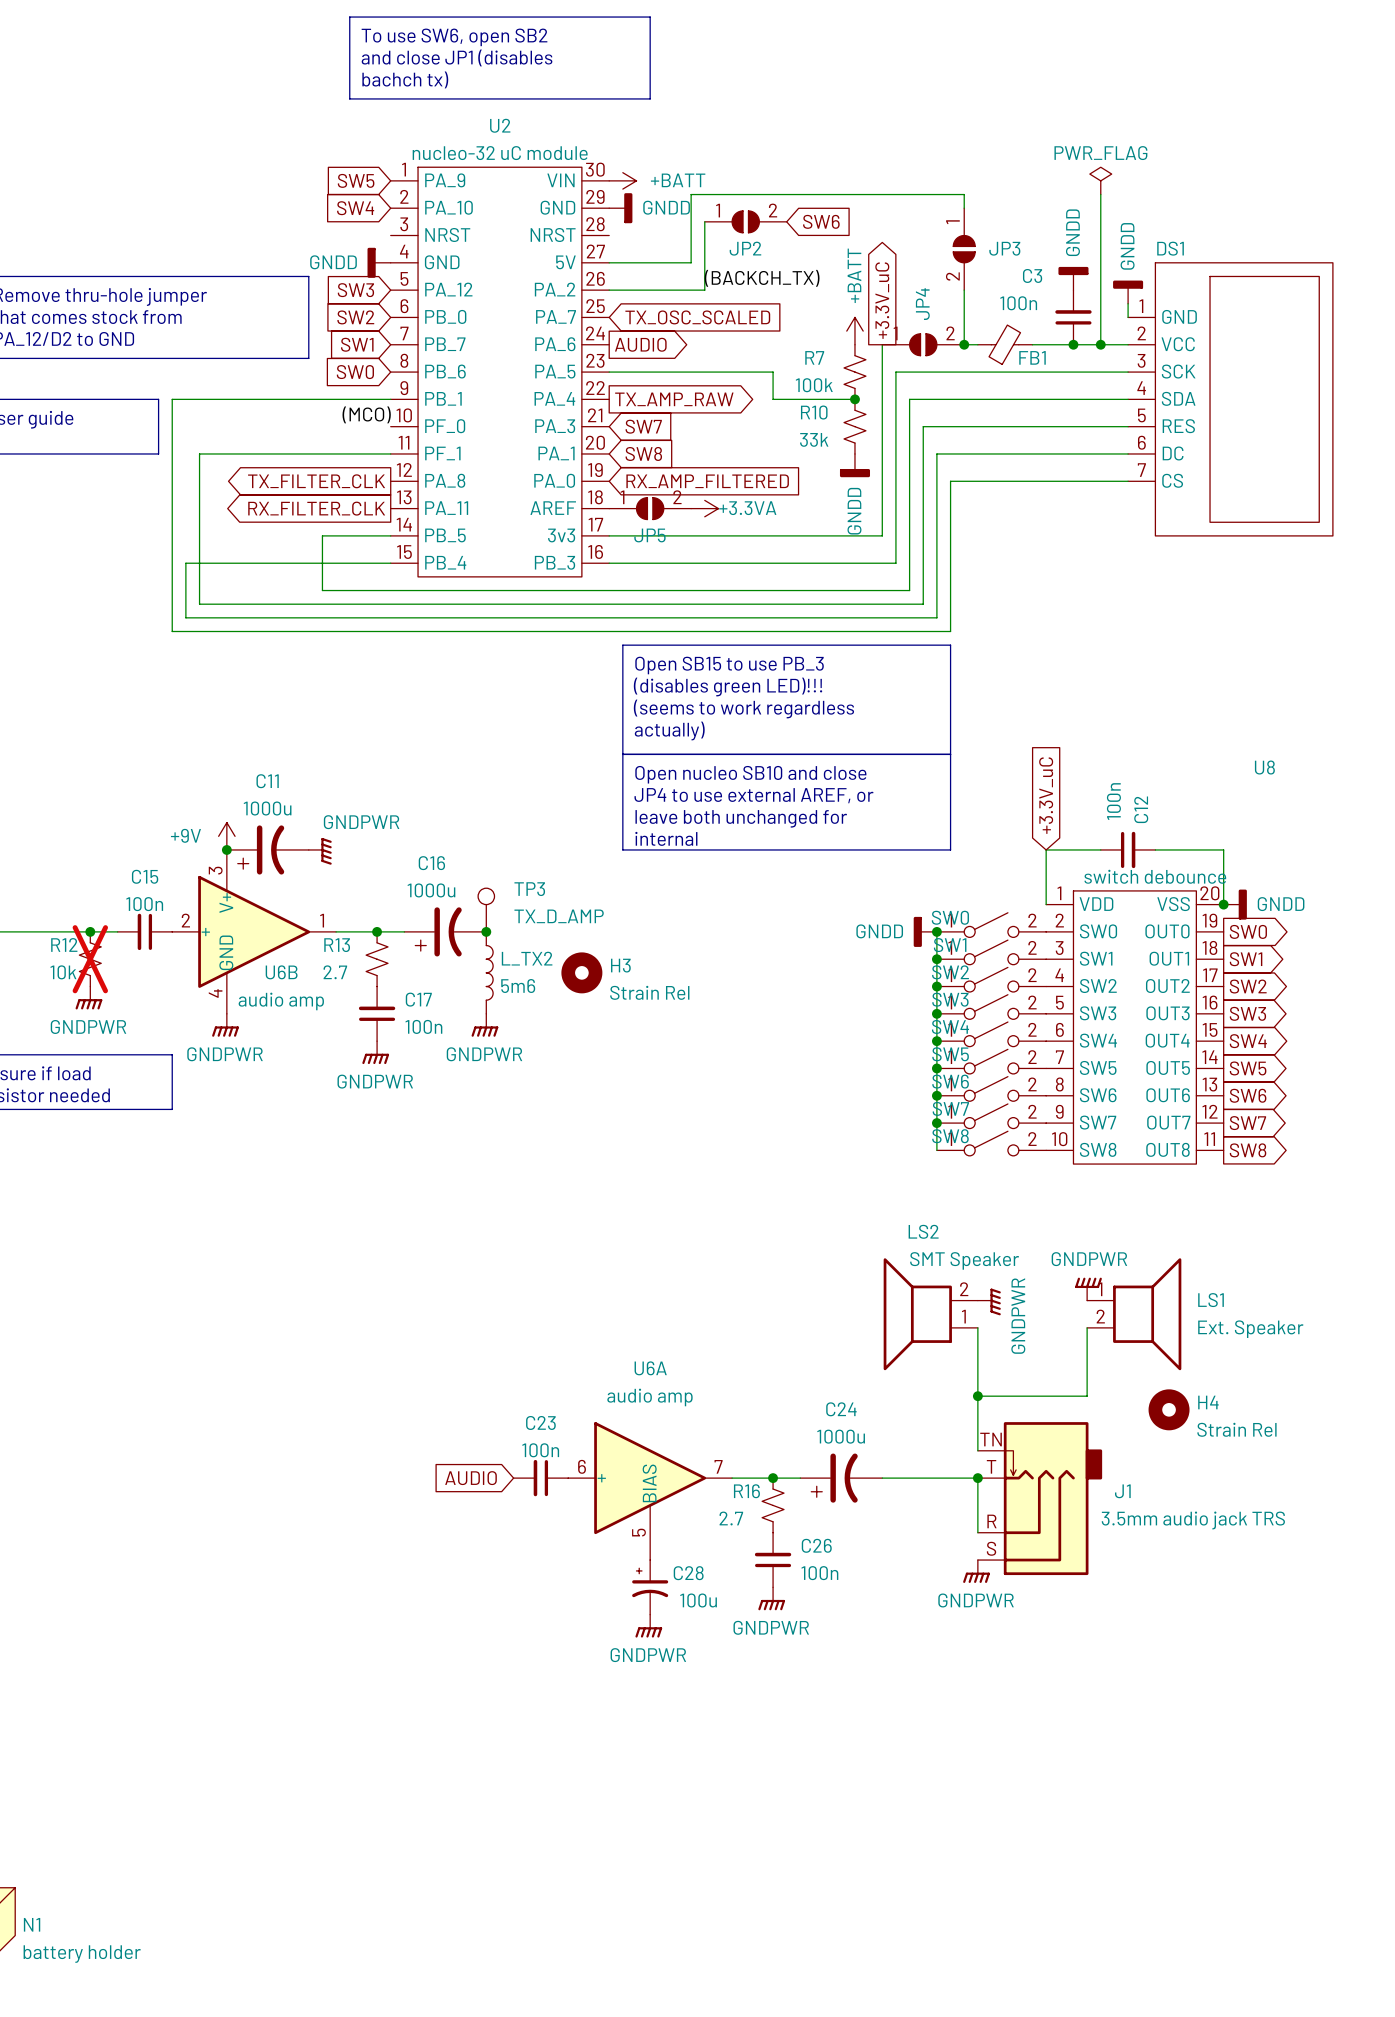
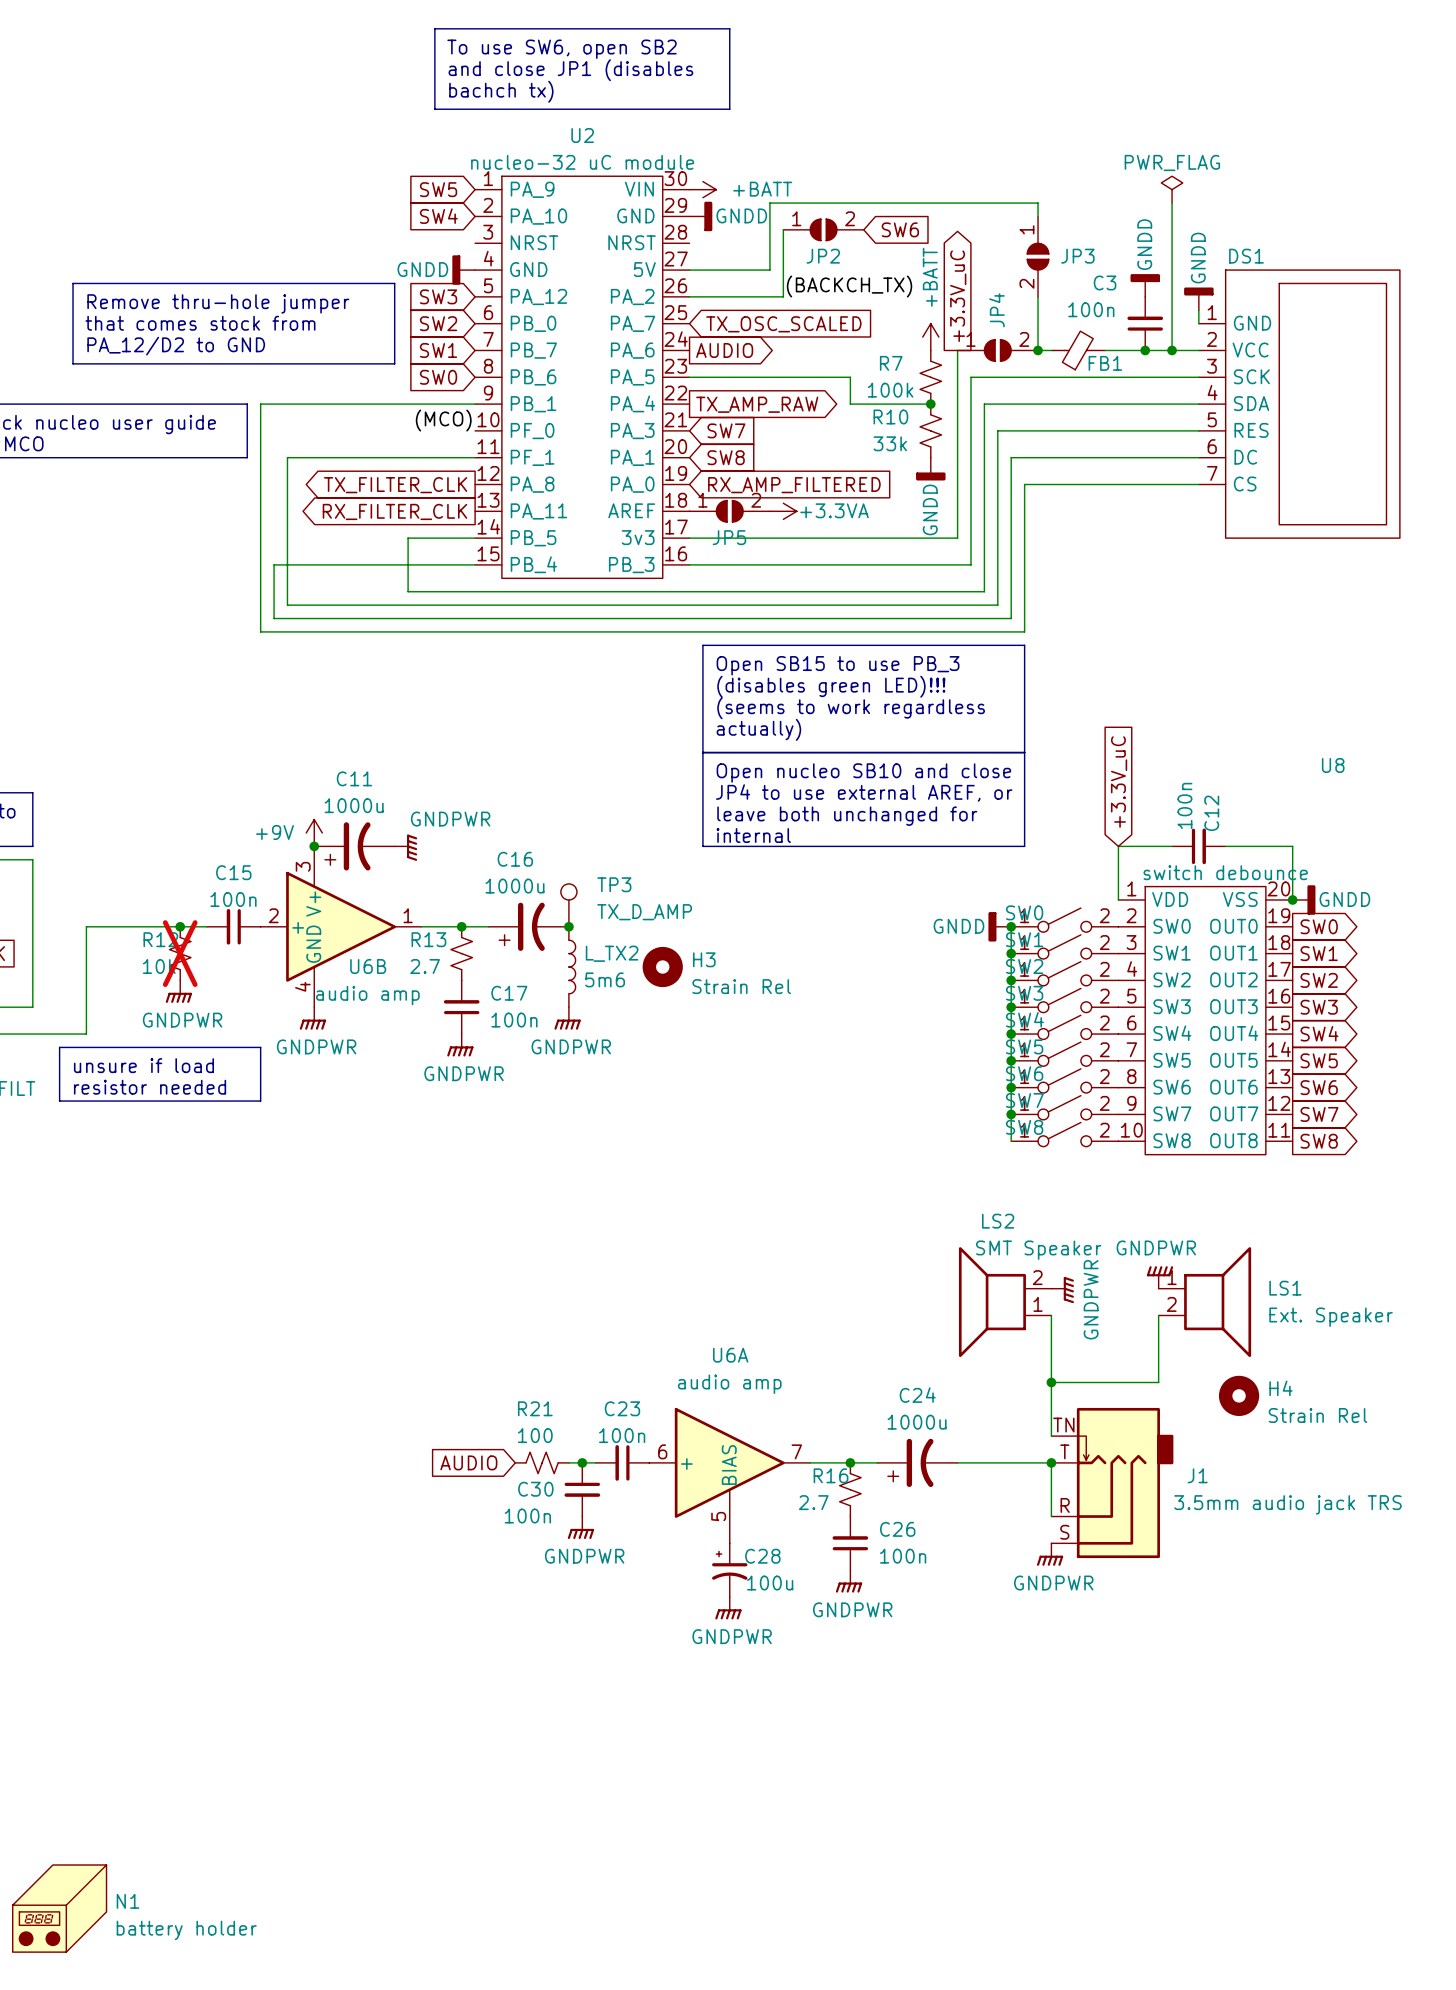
R21: none -> 100 (542, 1462)
global label position: AUDIO (471, 1478) -> AUDIO (468, 1462)
wire: none -> (568, 1462) (595, 1462)
junction: none -> (582, 1462)
C30: none -> 100n (582, 1489)
power symbol: none -> GNDPWR (580, 1527)

